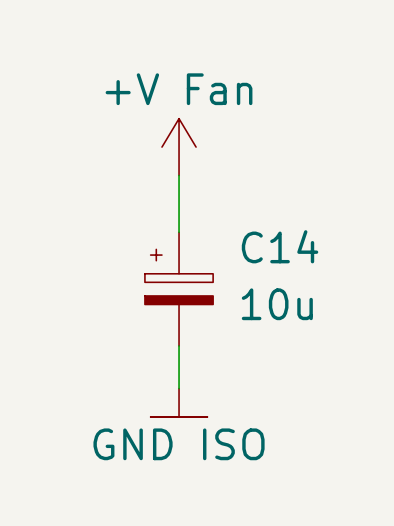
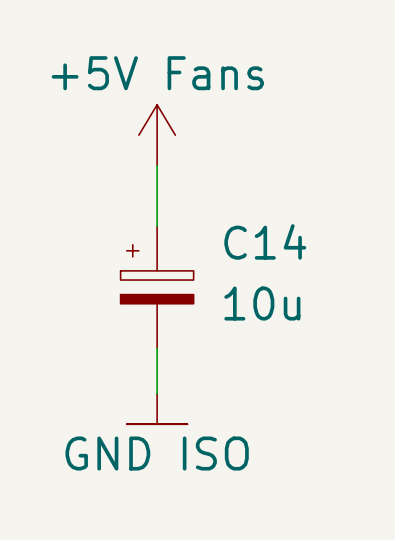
power symbol: +V Fan (179, 147) -> +5V Fans (157, 135)

